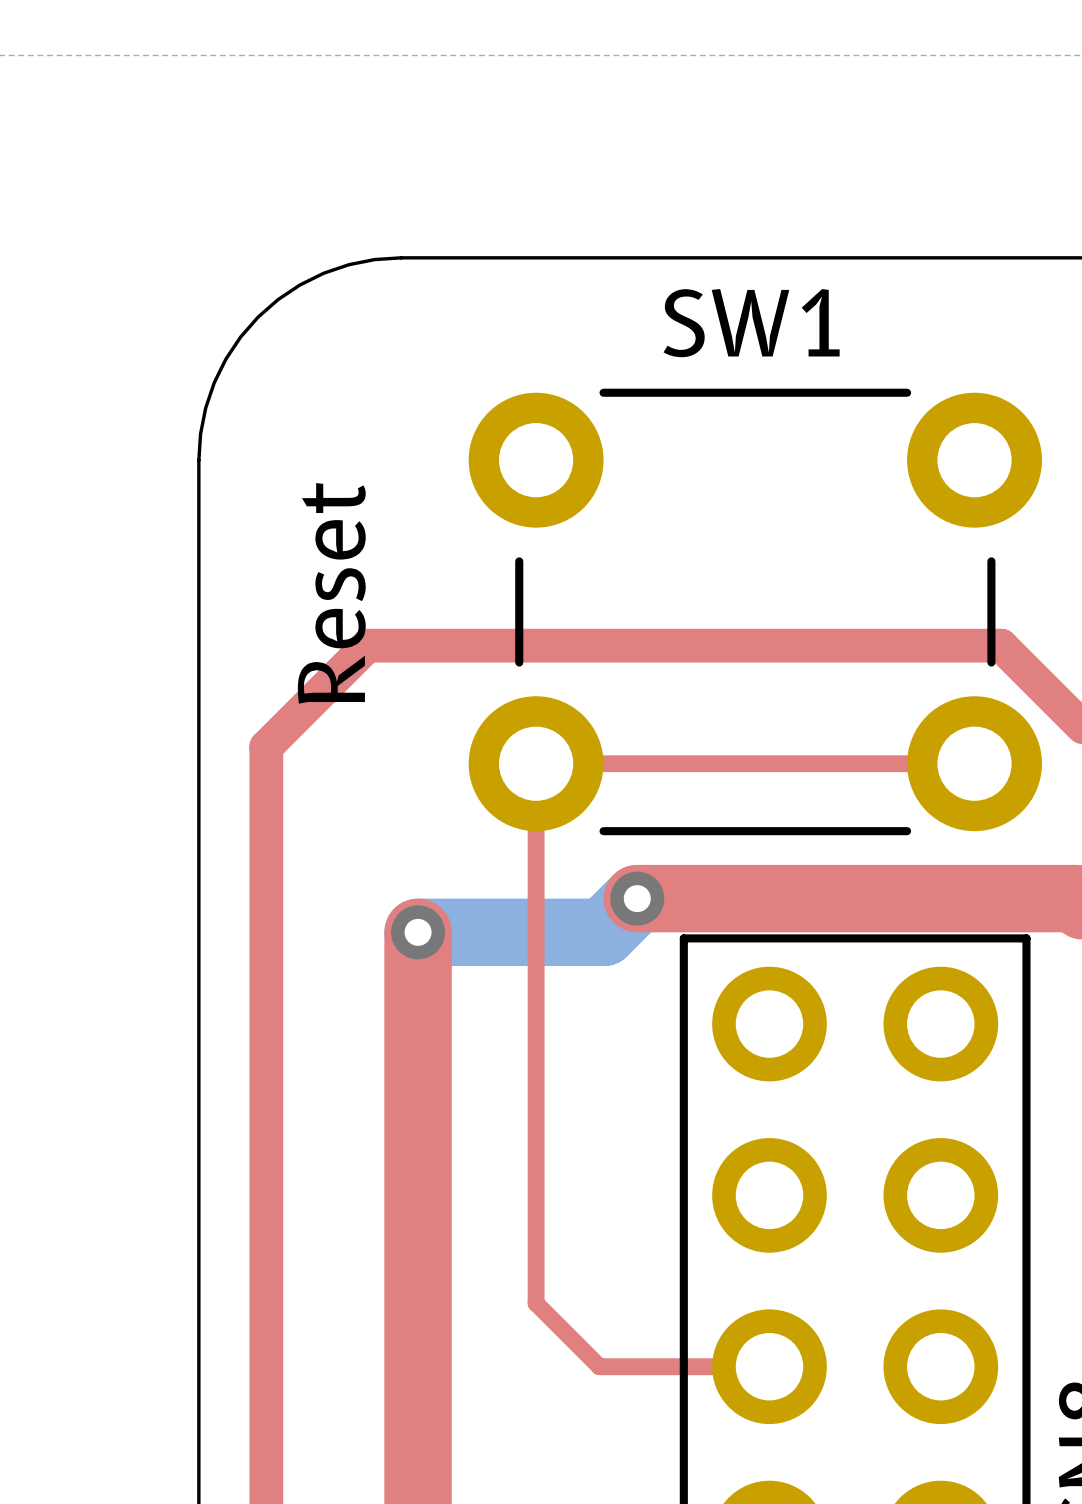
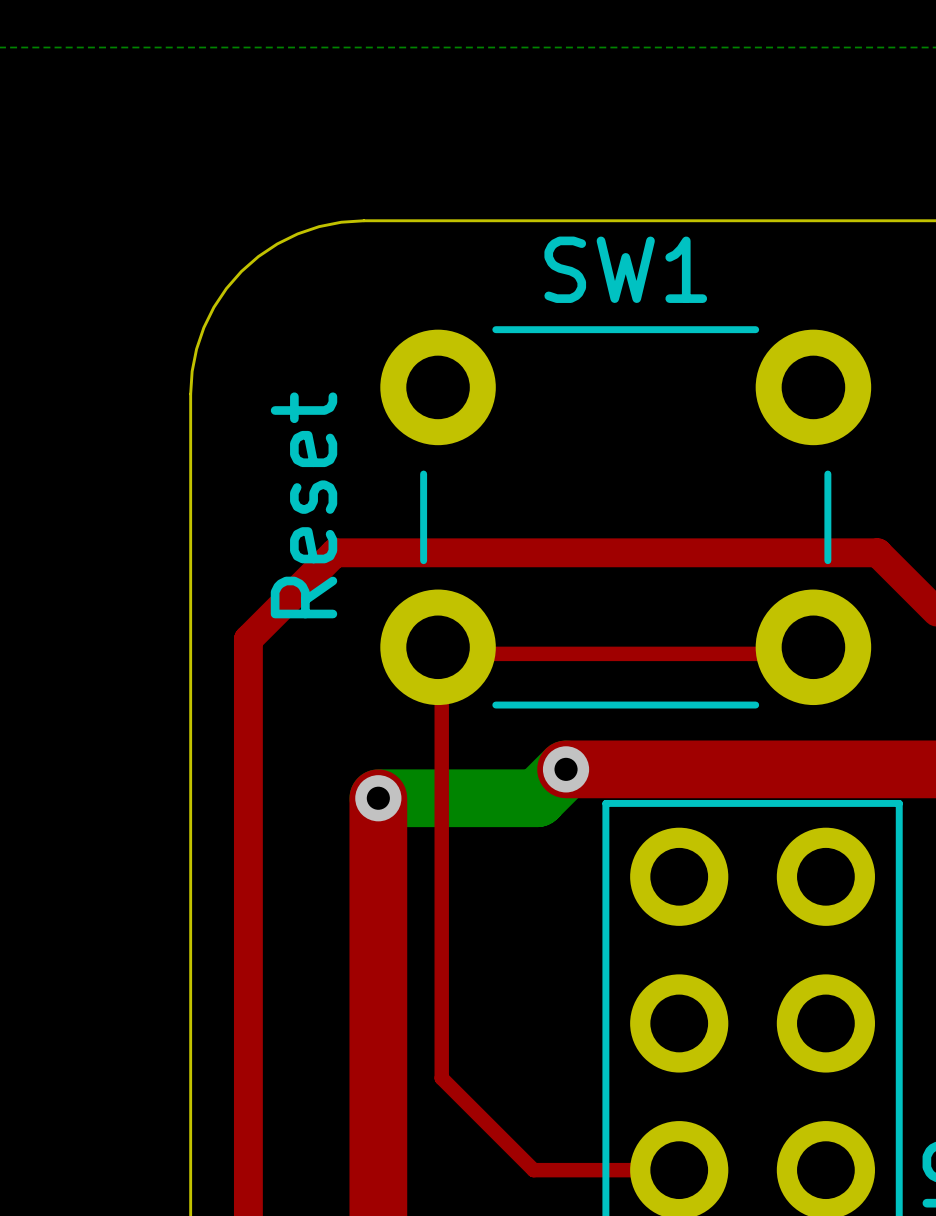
SW1 position: (755, 611) -> (625, 517)
top track: (536, 763) (536, 1303) -> (479, 653) (441, 653) (441, 1078) (479, 1115)

